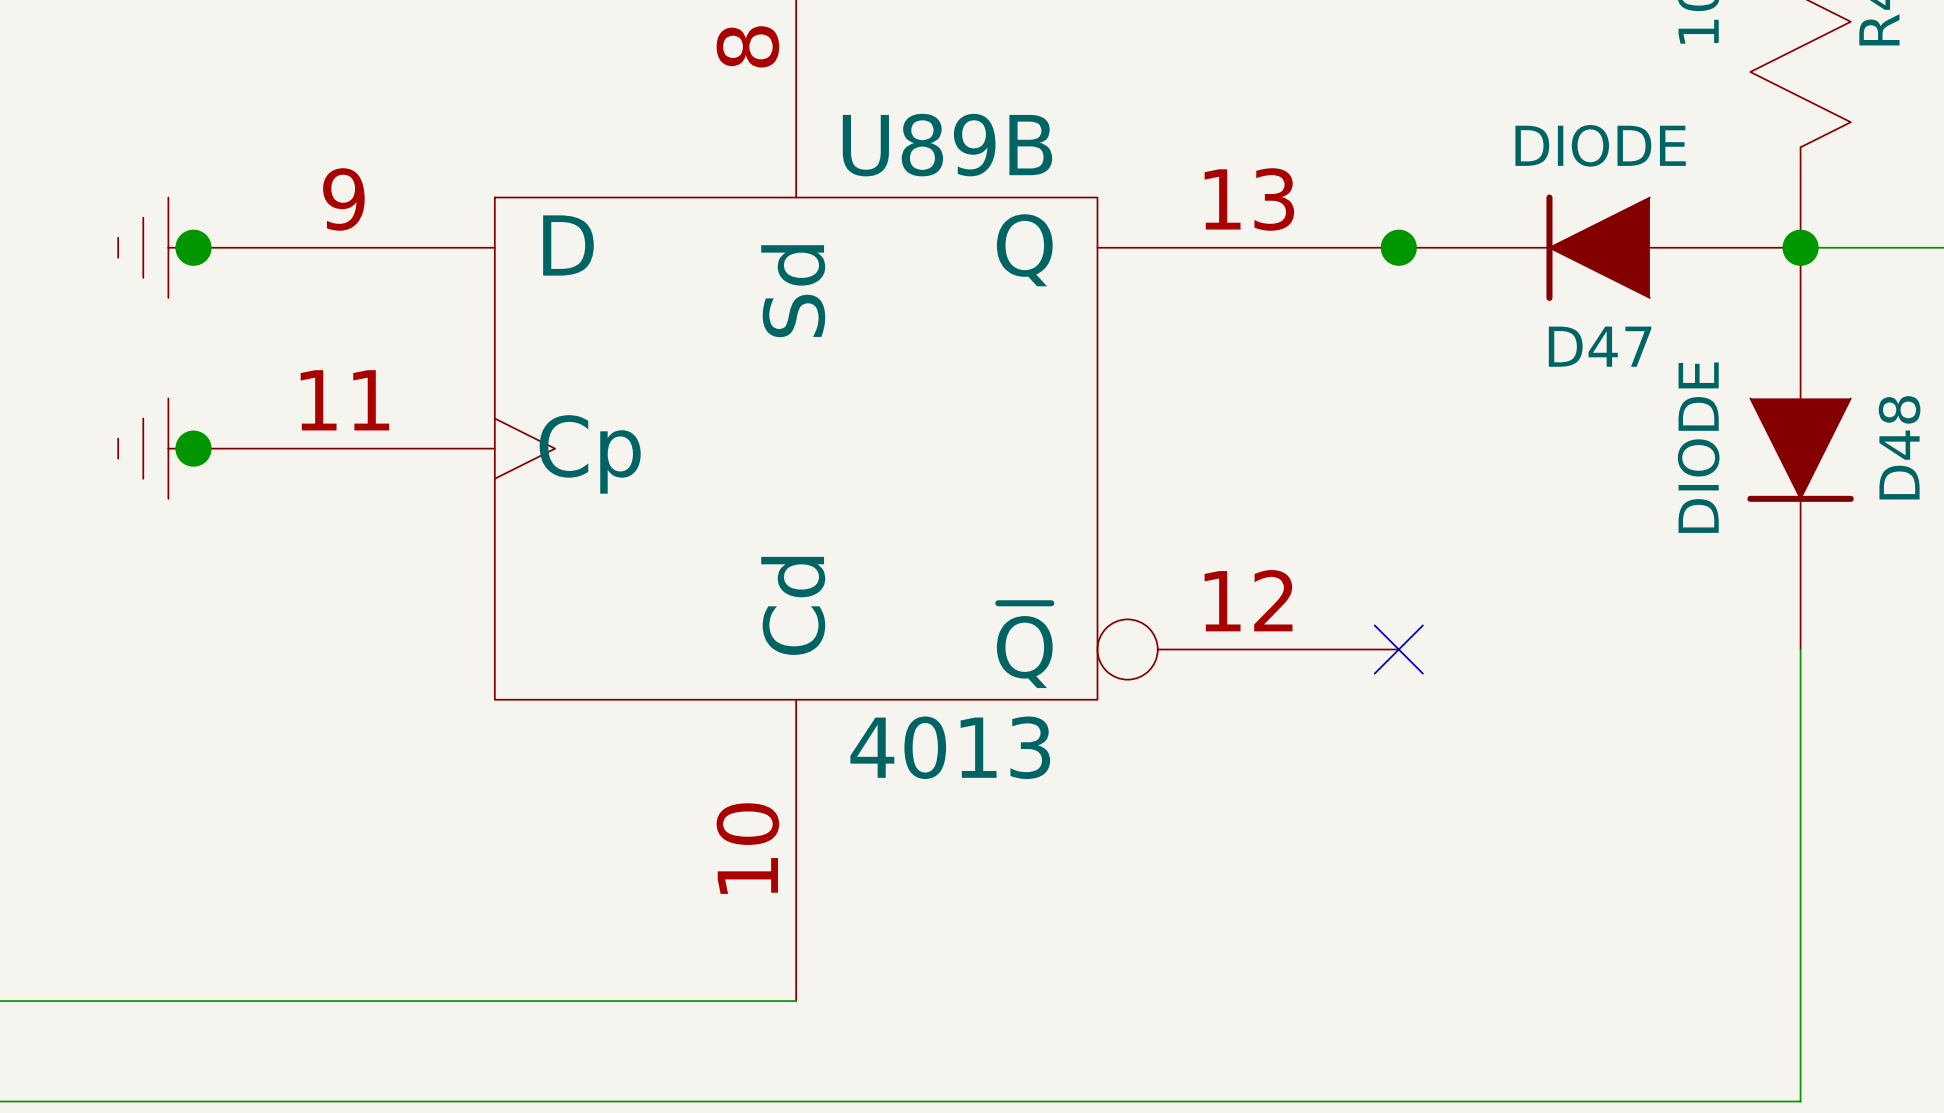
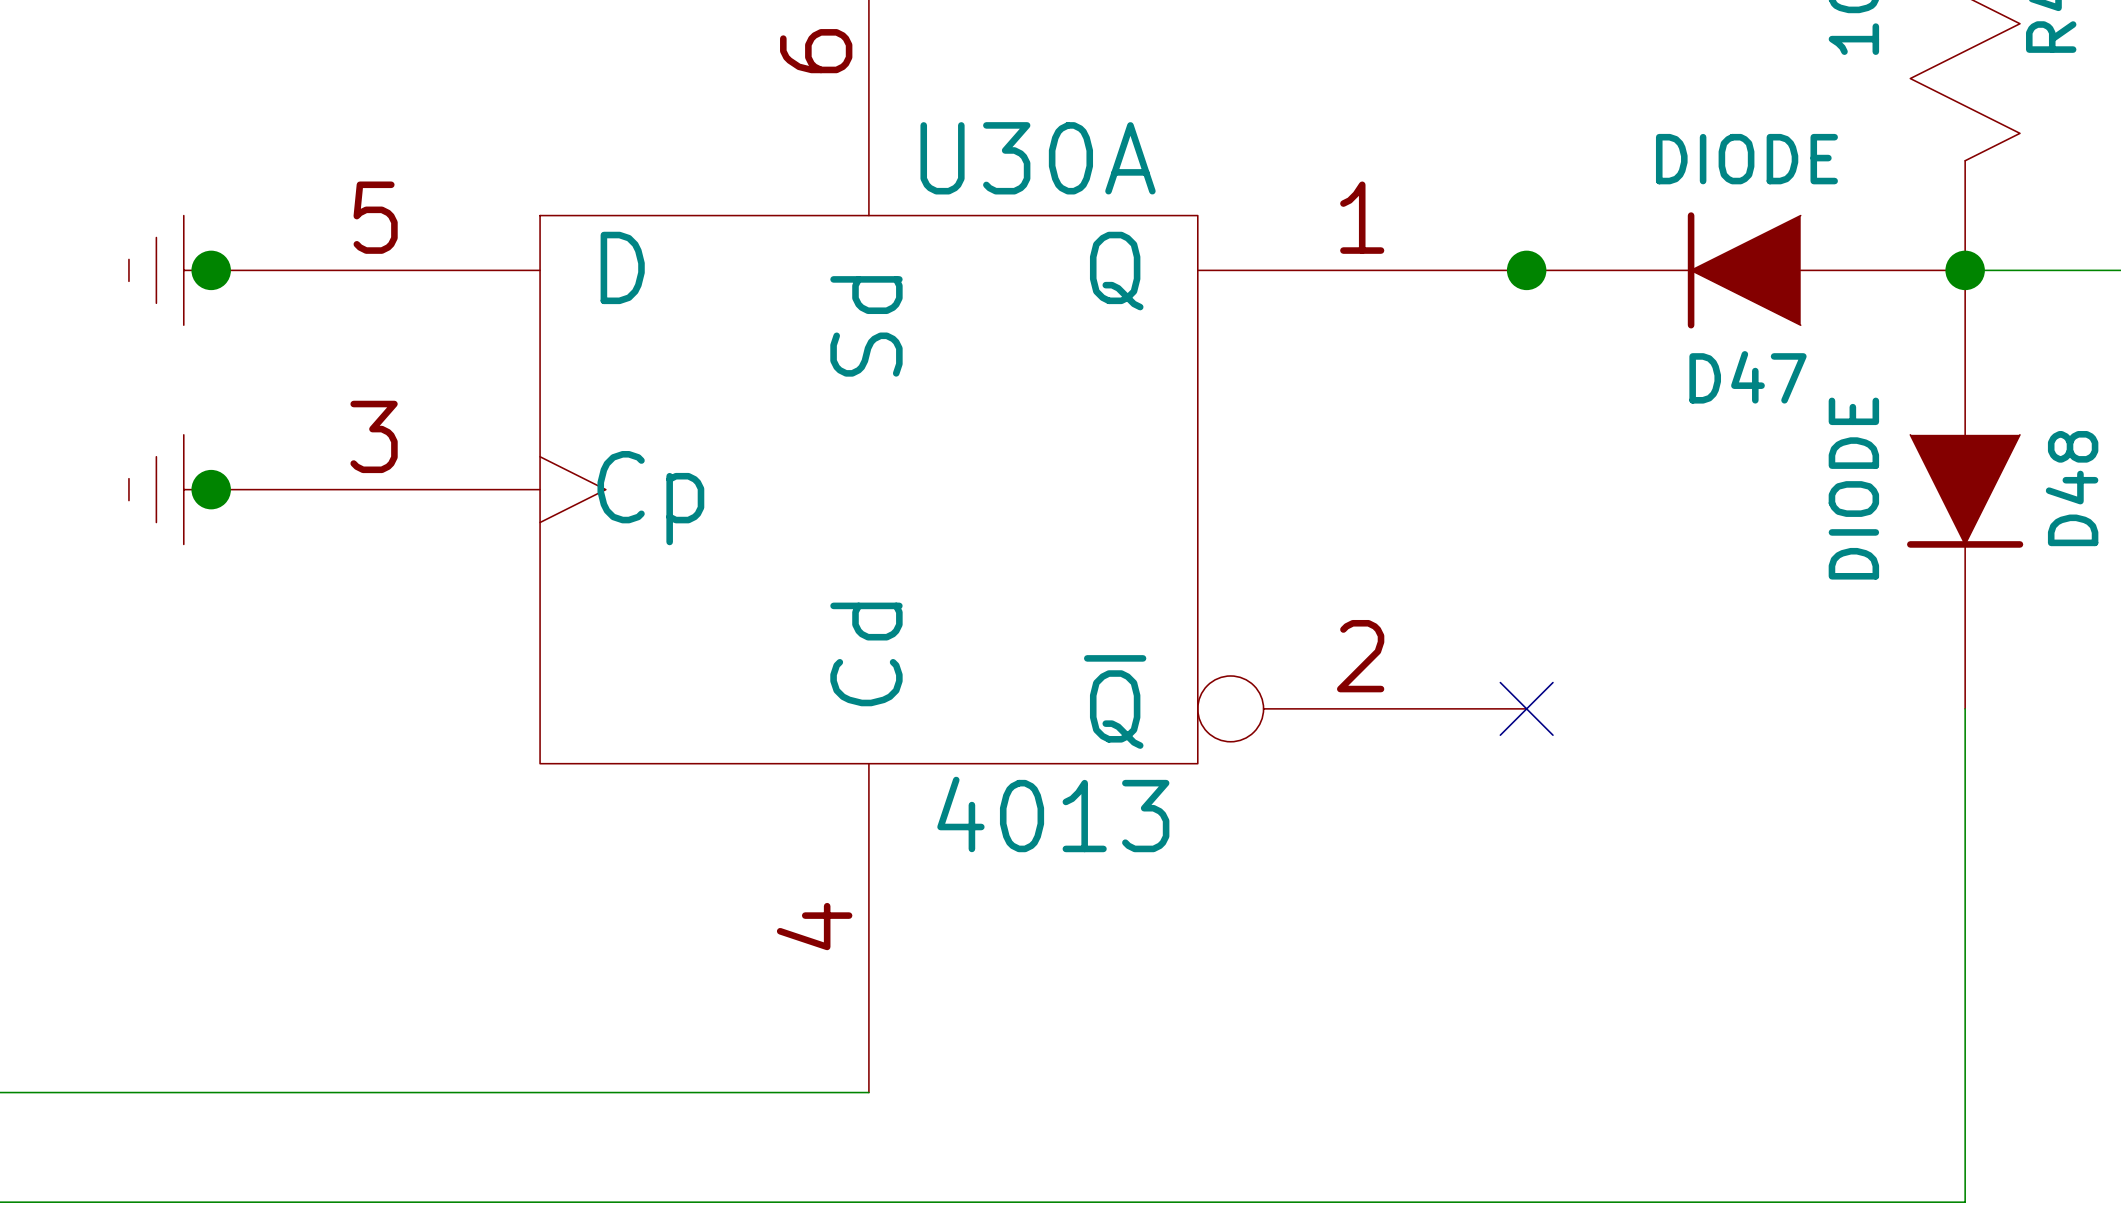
U89B pin number: 8 (747, 46) -> 6 (816, 51)
U89B name: U89B (947, 145) -> U30A (1038, 158)
U89B pin number: 9 (343, 199) -> 5 (375, 217)
U89B pin number: 13 (1249, 199) -> 1 (1362, 217)
U89B pin number: 11 (344, 400) -> 3 (374, 436)
U89B pin number: 12 (1248, 600) -> 2 (1360, 656)
U89B pin number: 10 (747, 848) -> 4 (814, 926)

